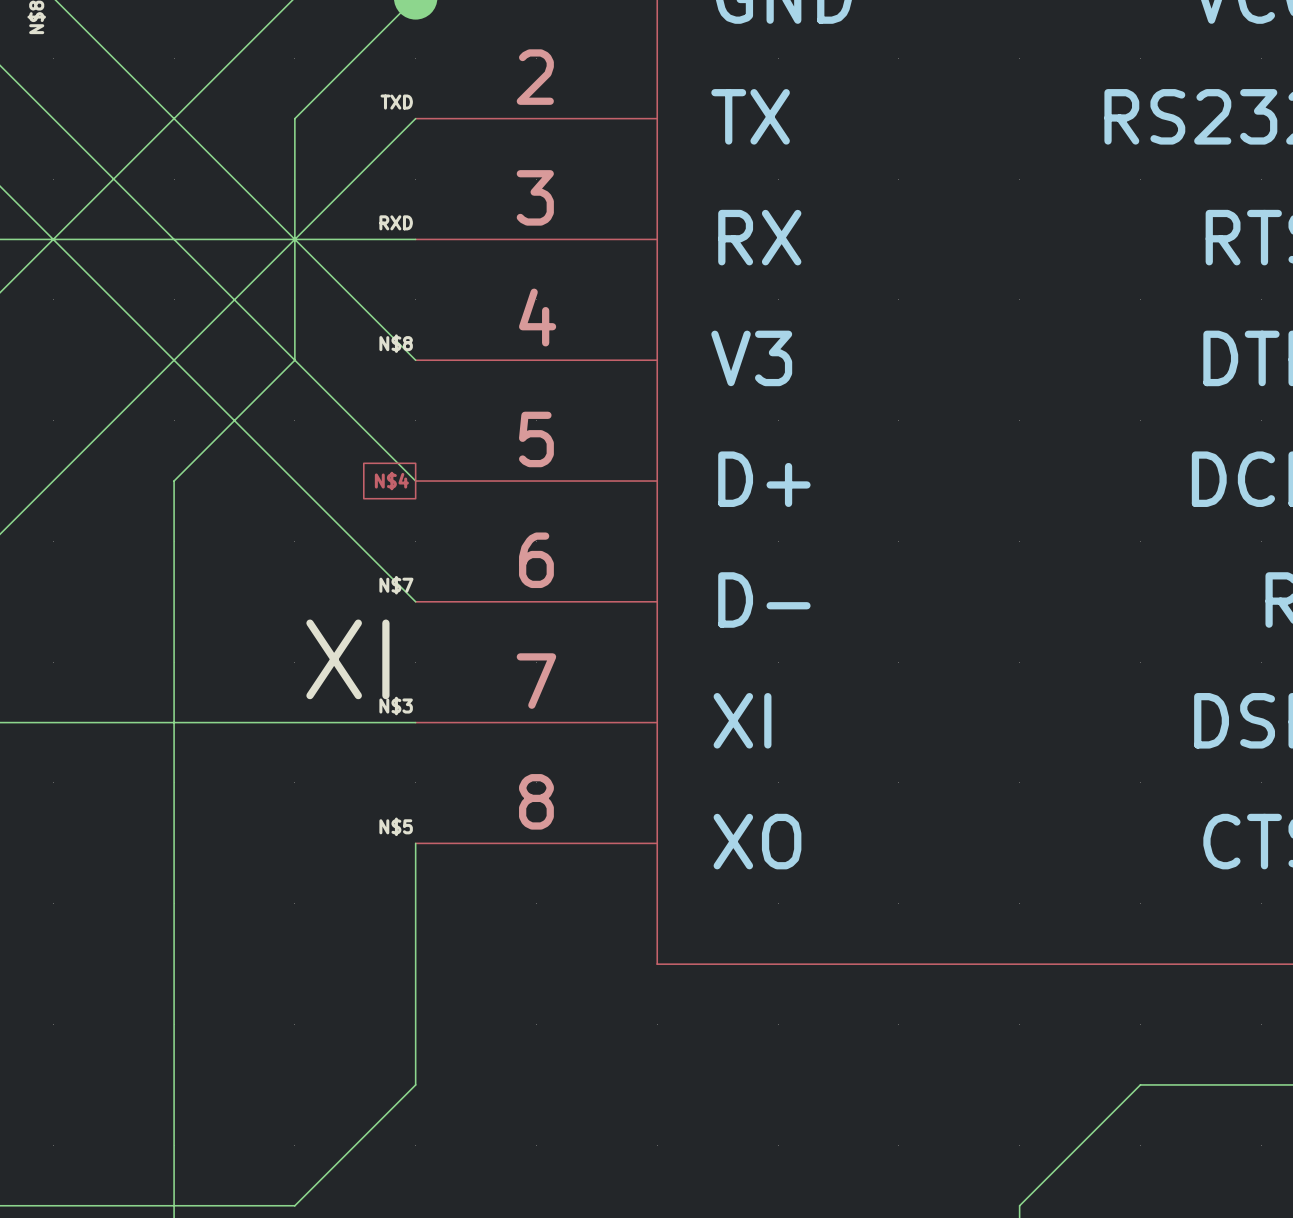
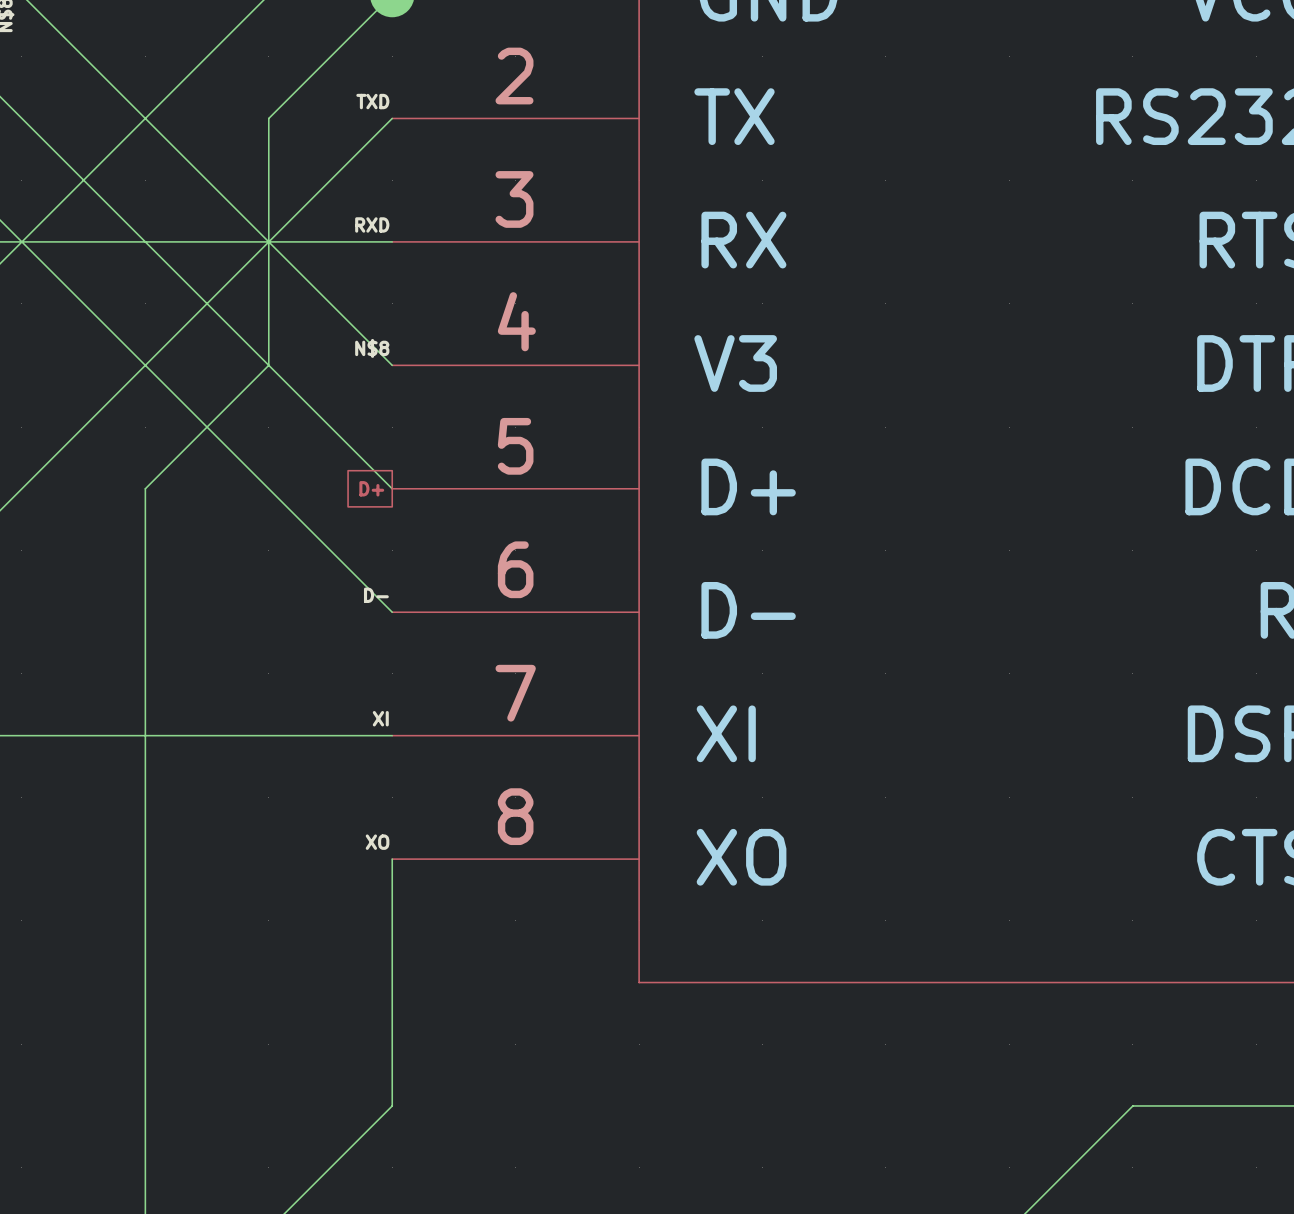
global label: N$4 (391, 481) -> D+ (371, 488)
label: N$7 (396, 585) -> D- (376, 595)
label: XI (347, 659) -> none
label: N$3 (396, 706) -> XI (380, 718)
label: N$5 (396, 826) -> XO (377, 842)

